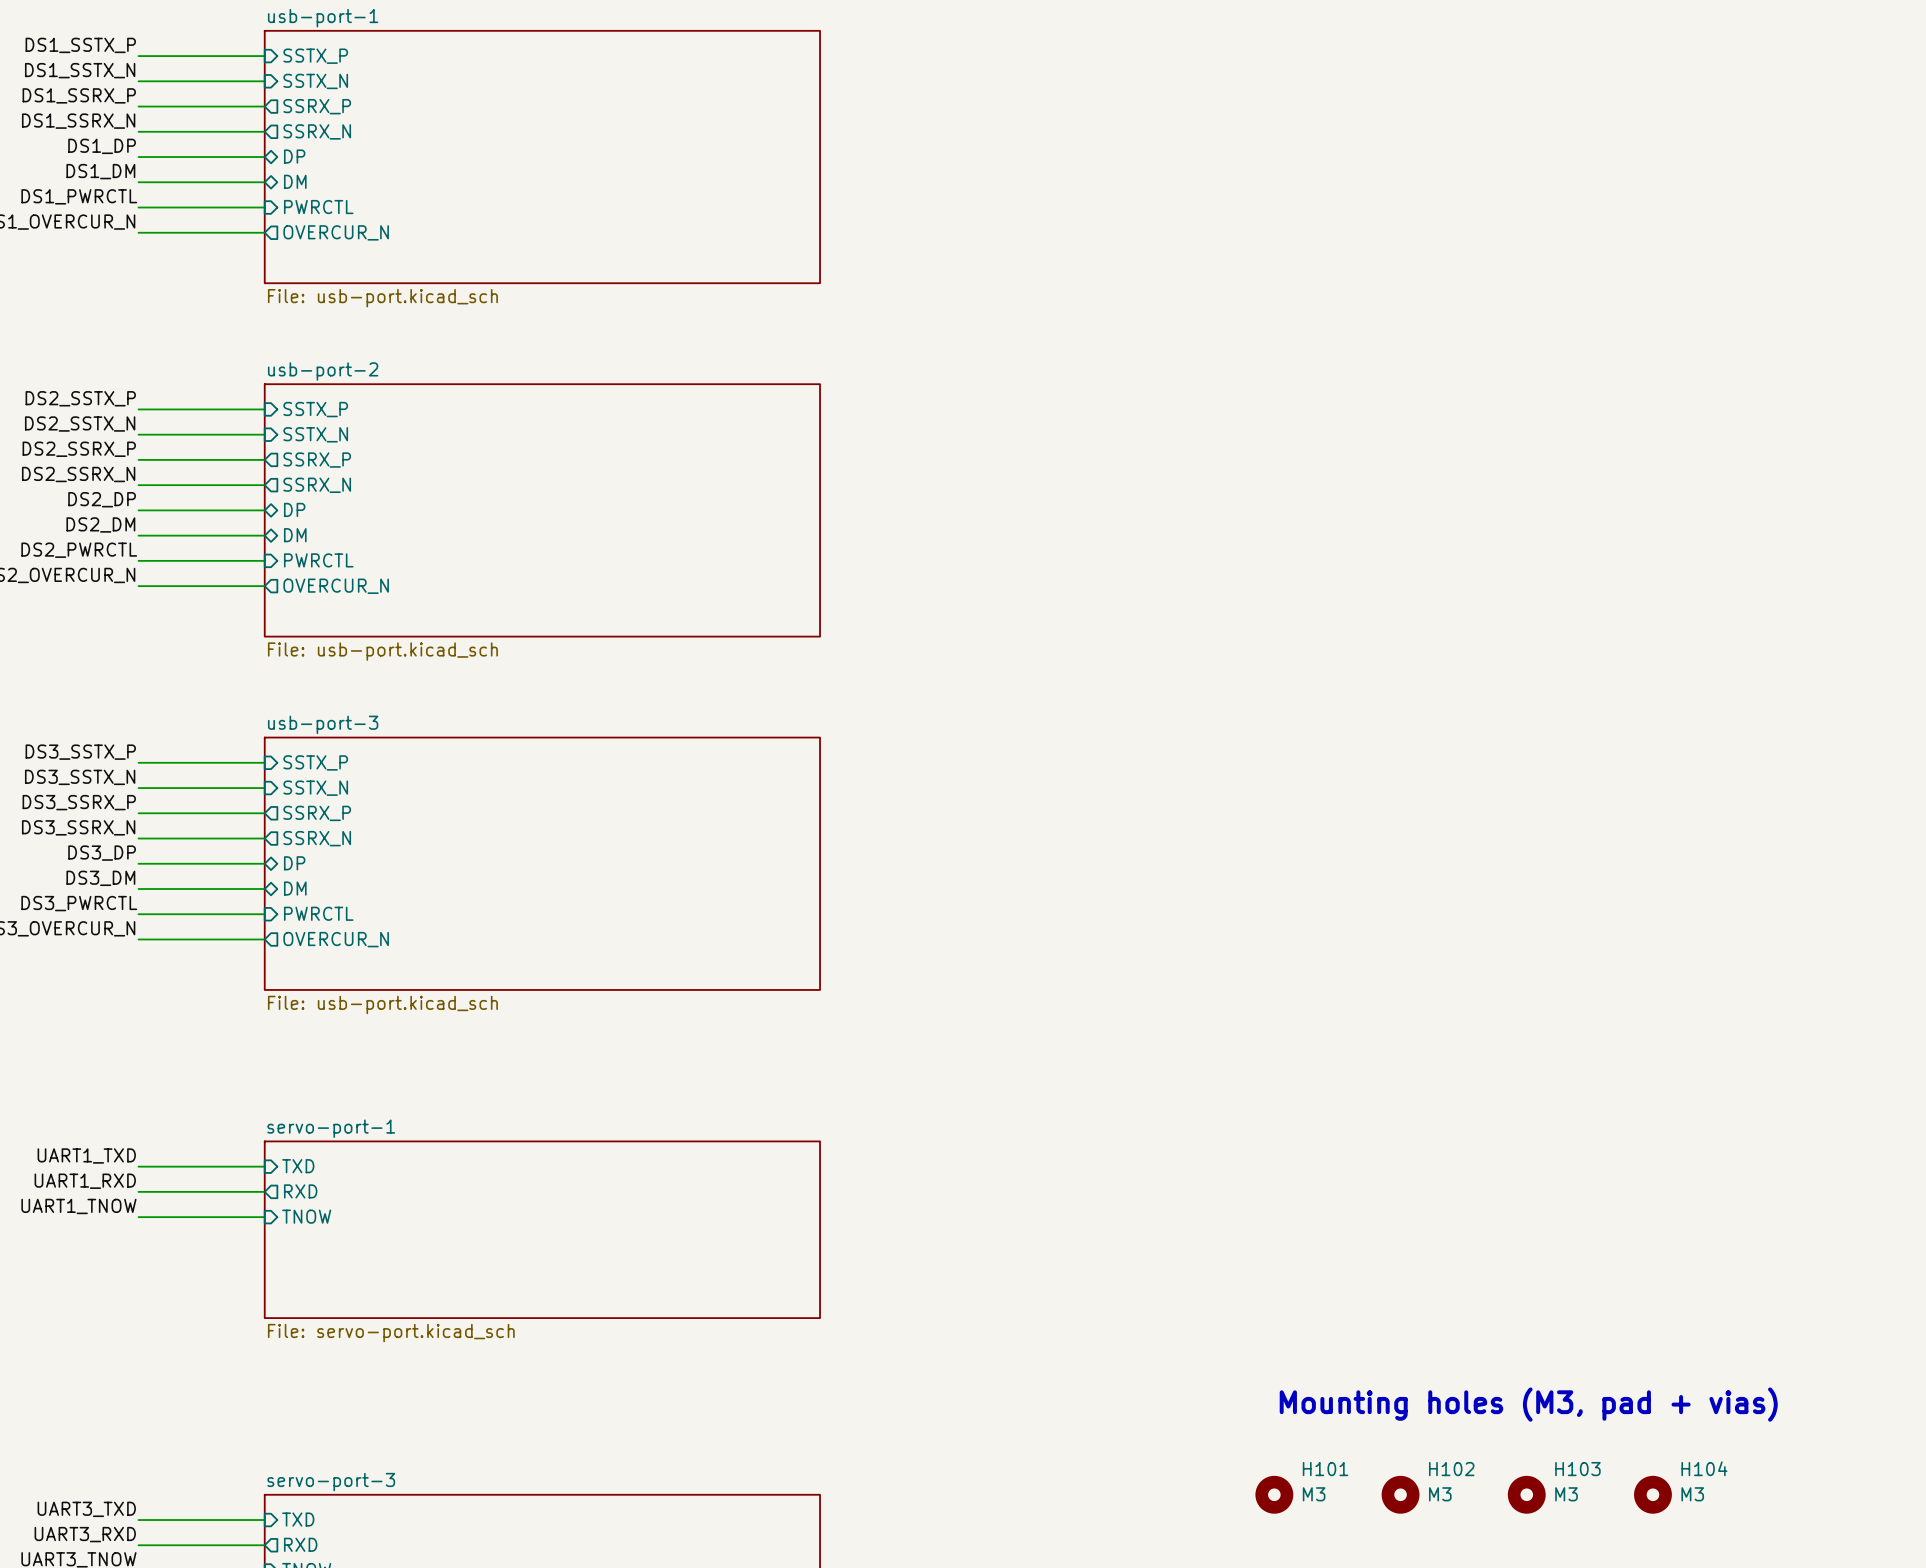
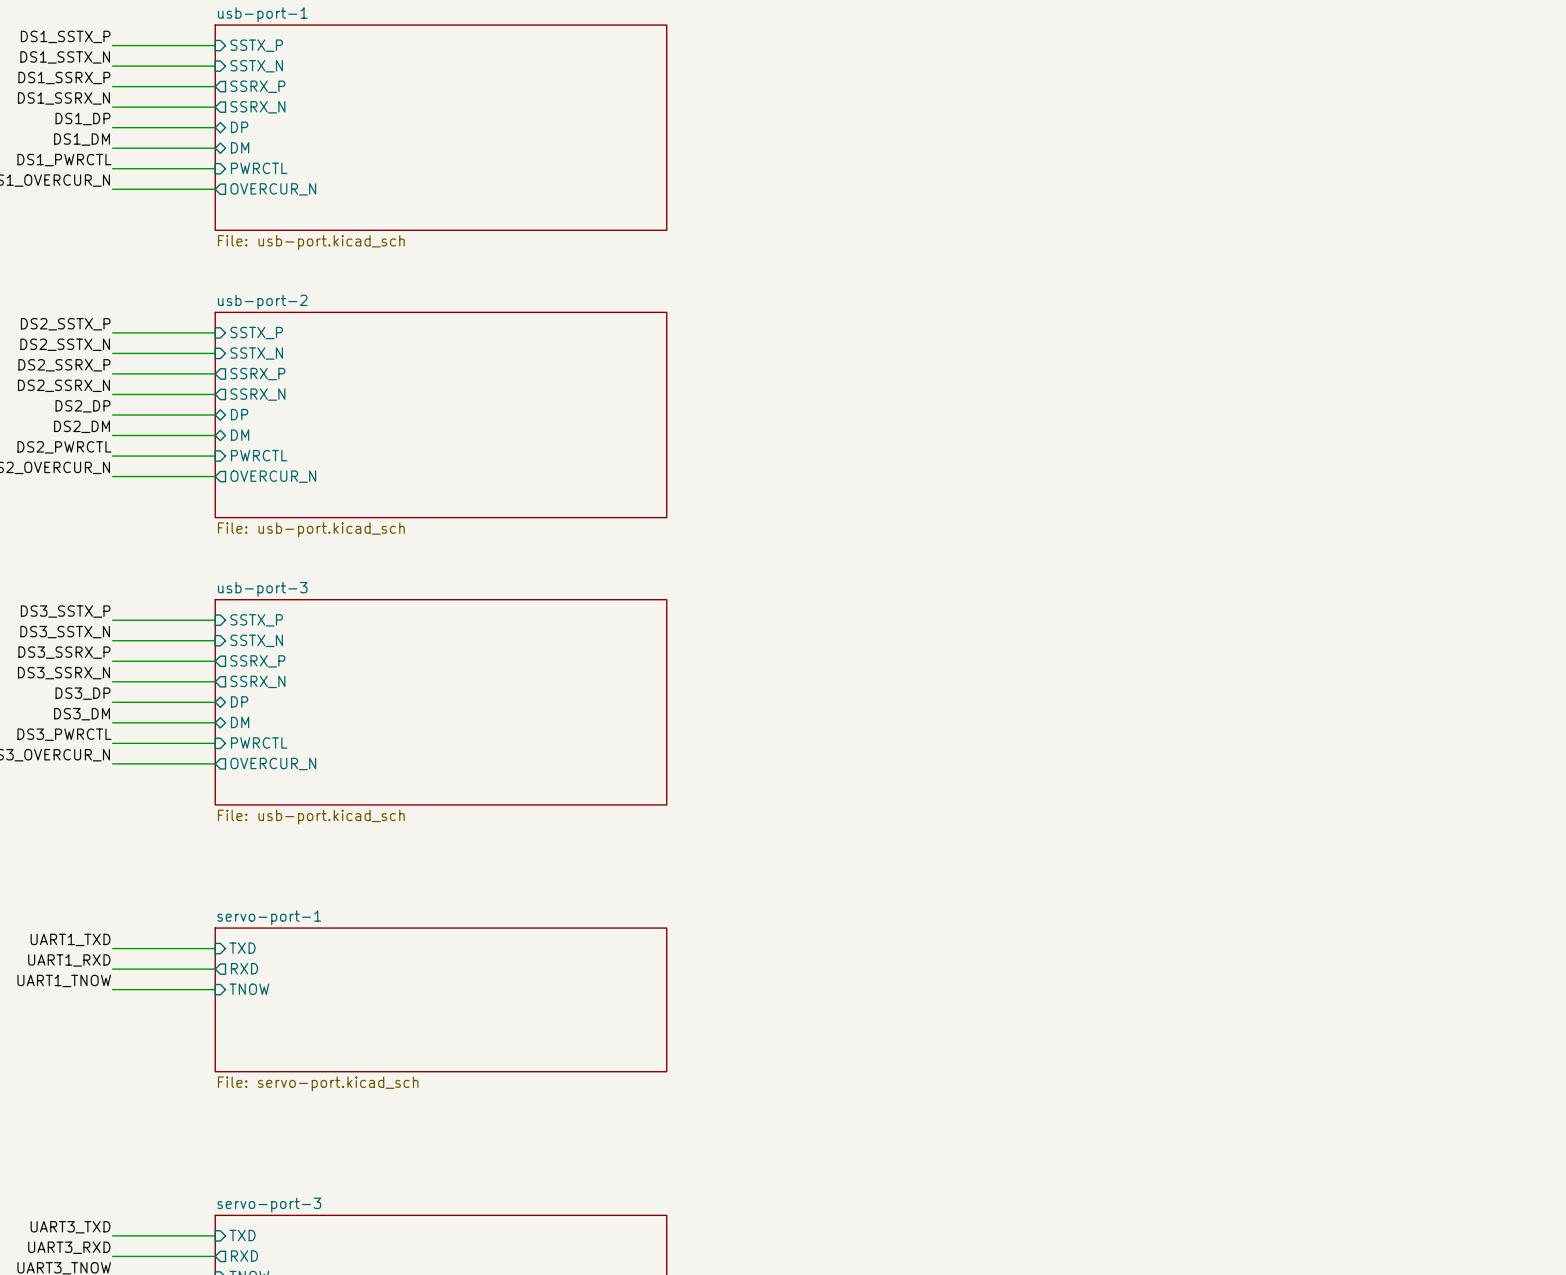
text: Mounting holes (M3, pad + vias) (1528, 1404) -> none
H101: M3 (1274, 1494) -> none
H102: M3 (1400, 1494) -> none
H103: M3 (1526, 1494) -> none
H104: M3 (1652, 1494) -> none

